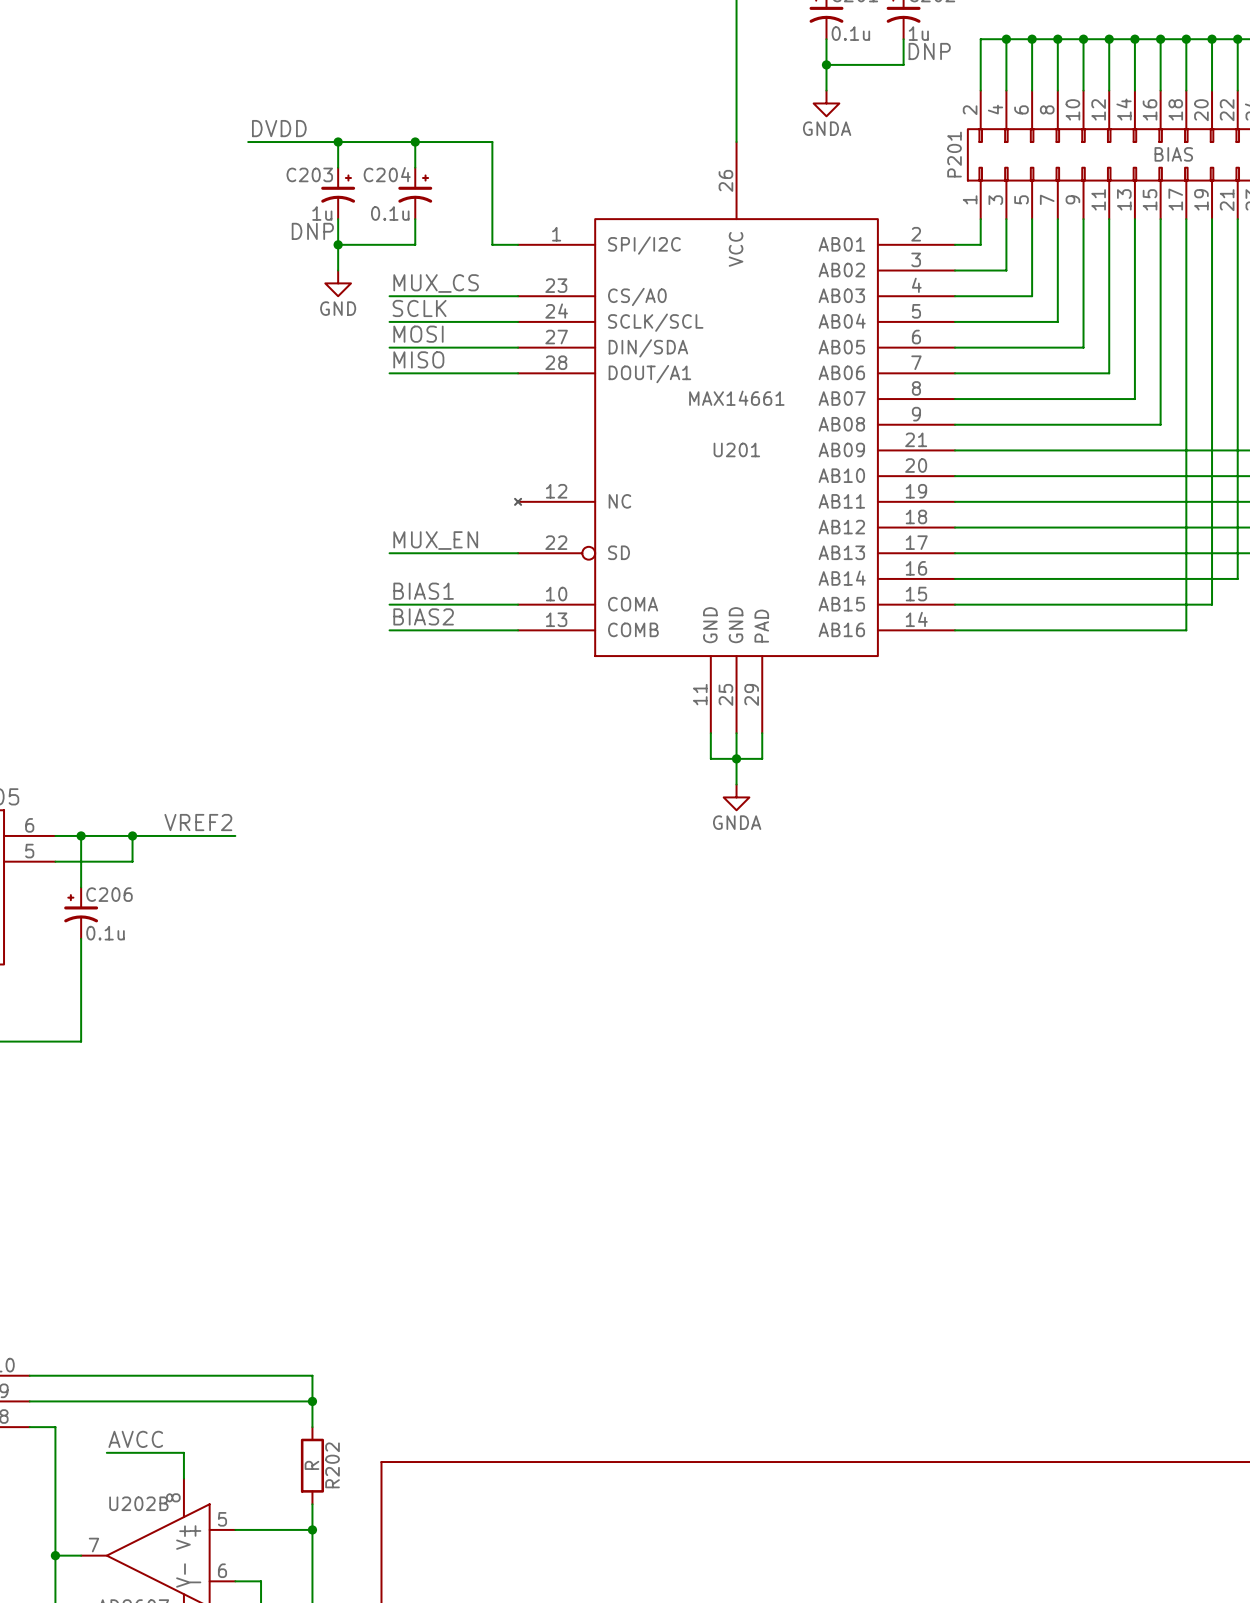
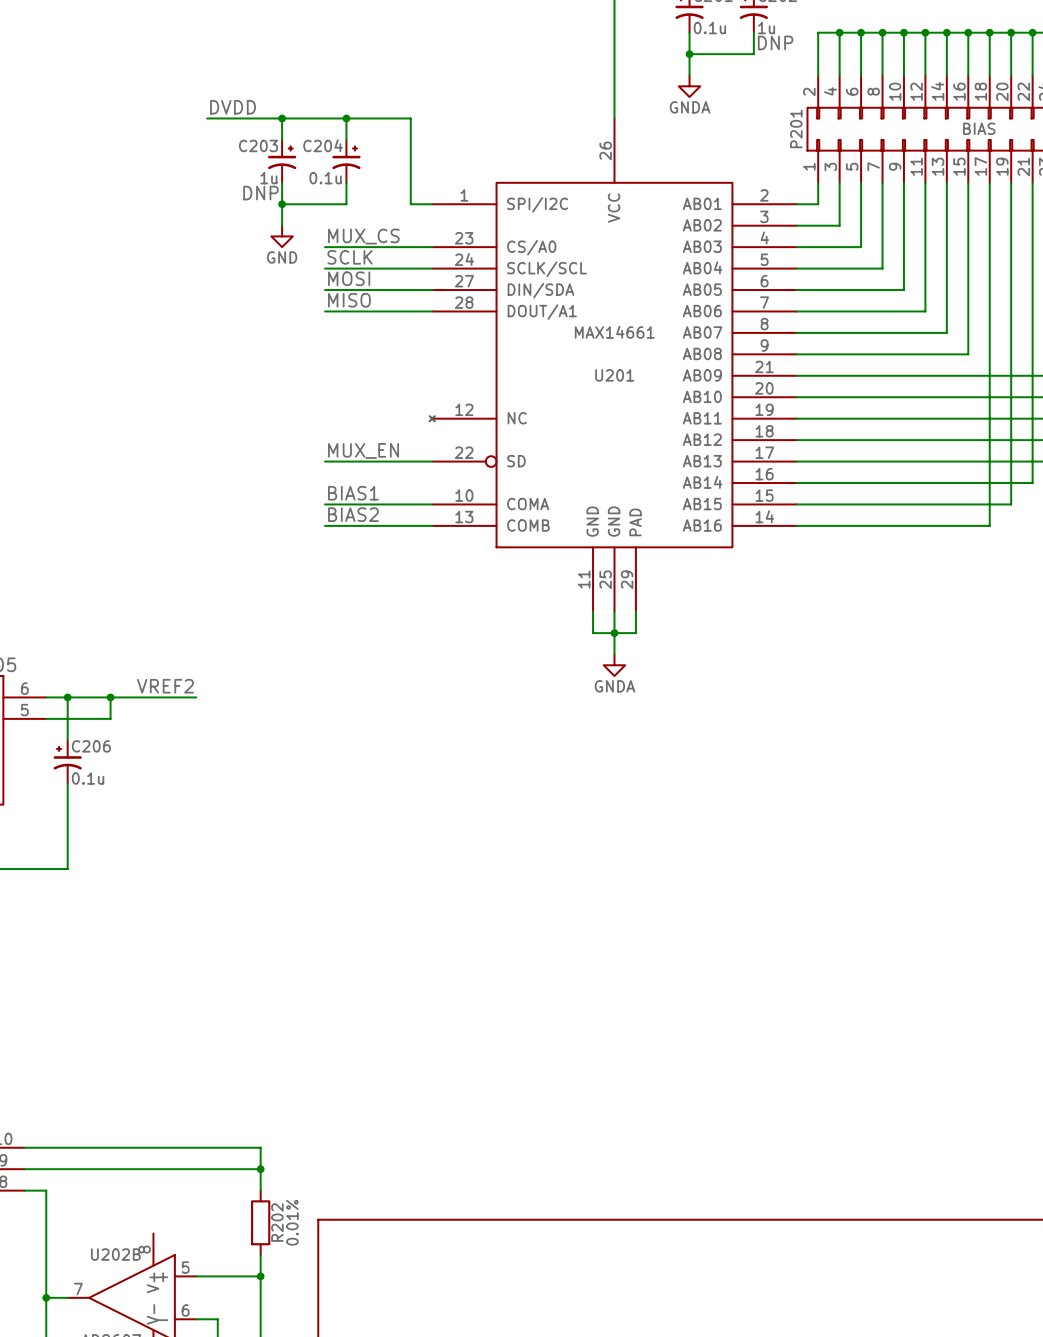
label: AVCC (135, 1439) -> none
wire: (106, 1452) (183, 1452) (183, 1478) -> none
R202 value: R (311, 1465) -> 0.01% (292, 1222)

